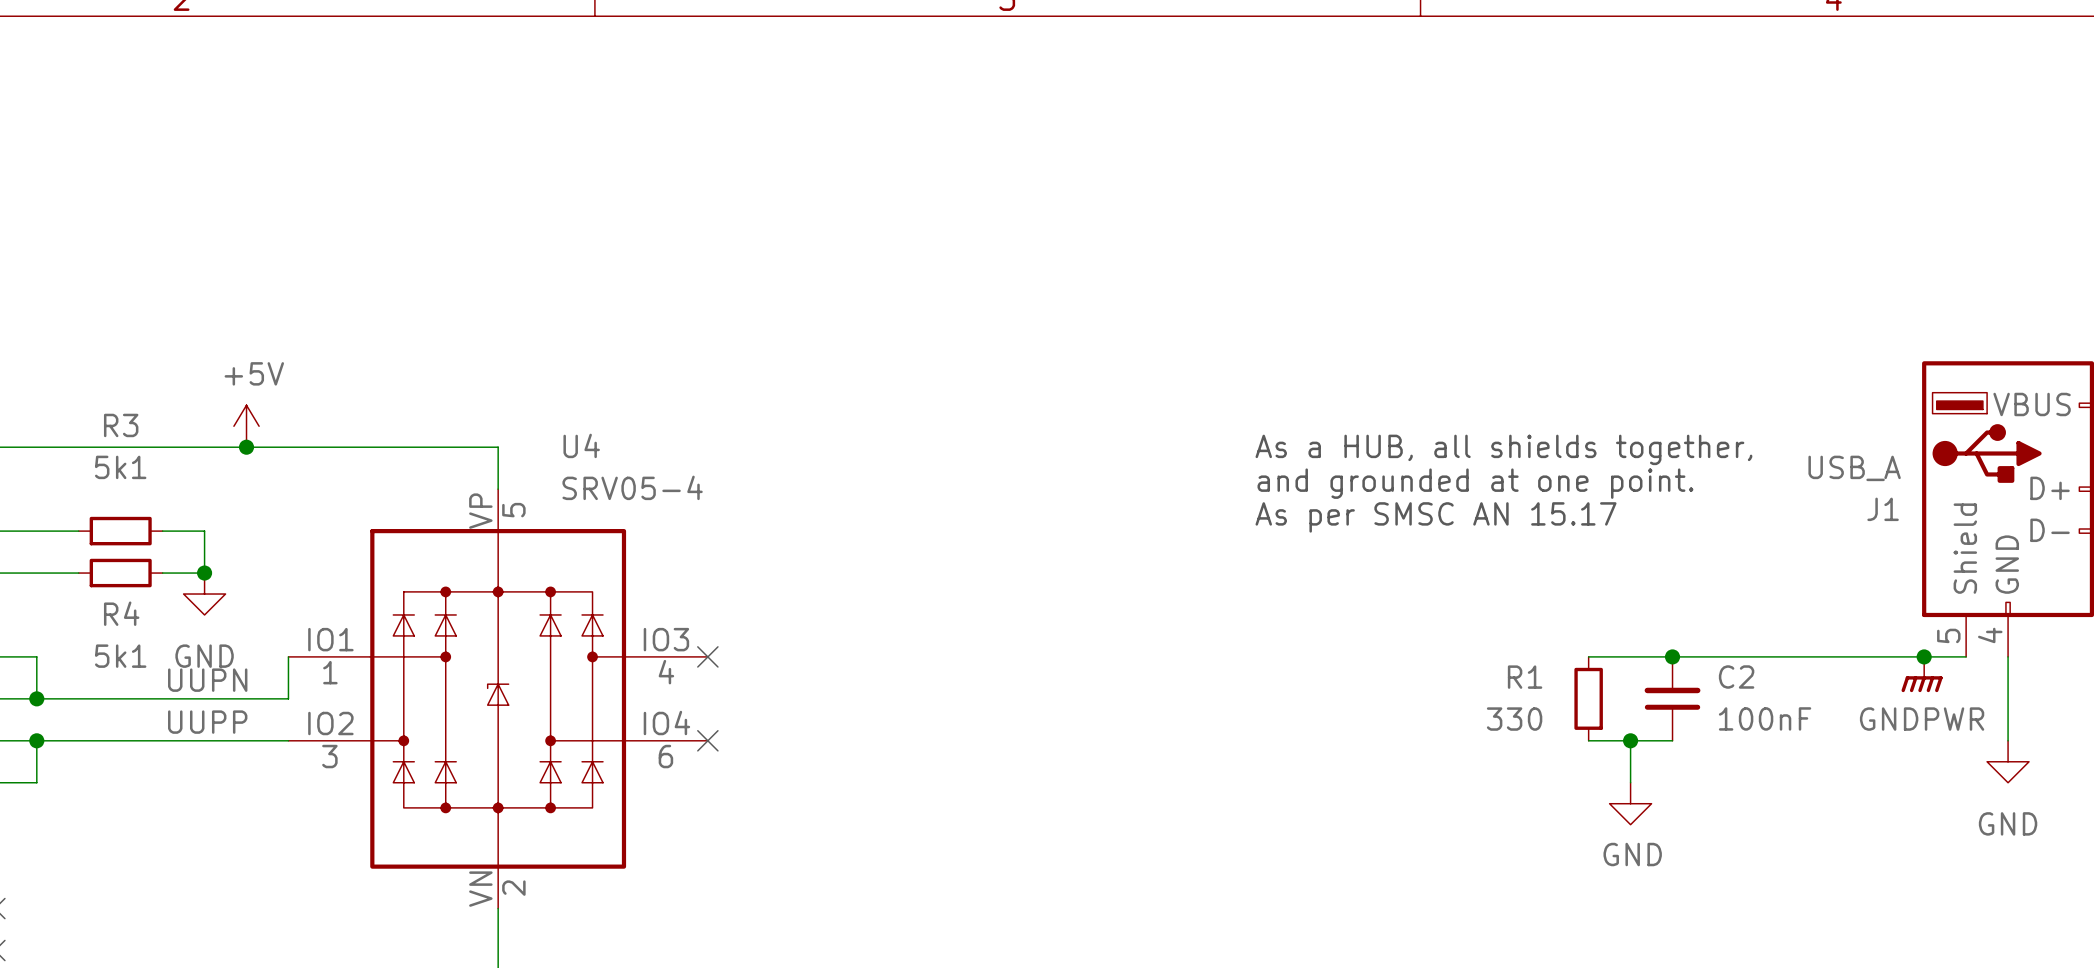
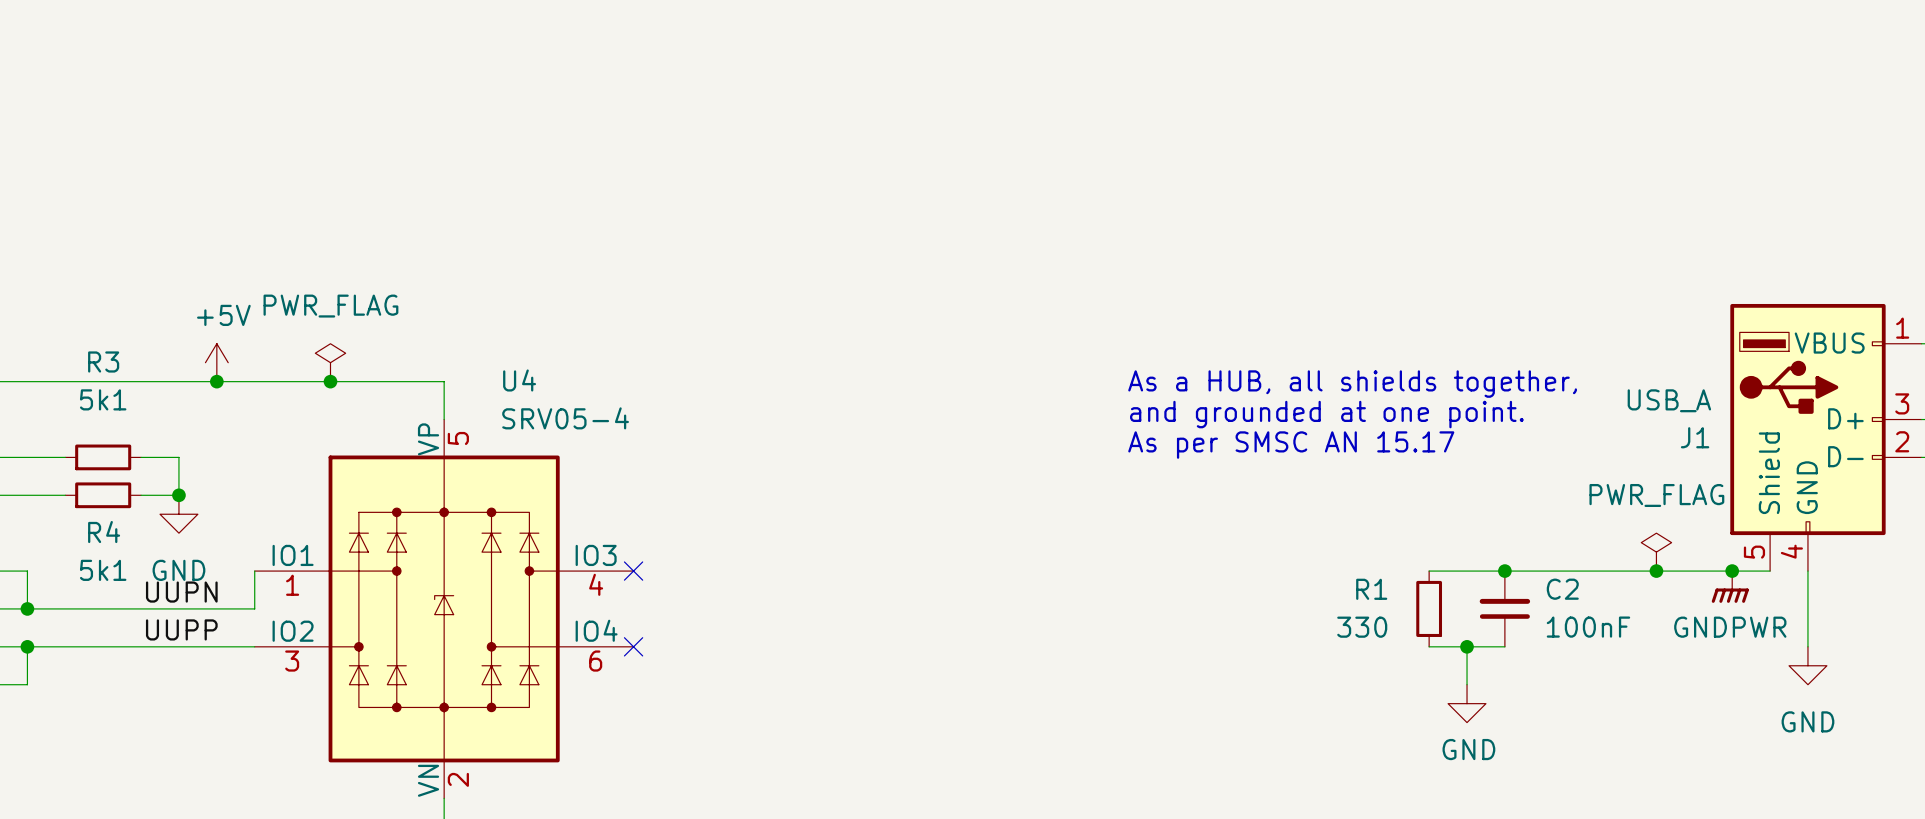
power symbol: none -> PWR_FLAG (330, 362)
junction: none -> (330, 381)
power symbol: none -> PWR_FLAG (1656, 552)
junction: none -> (1656, 571)

